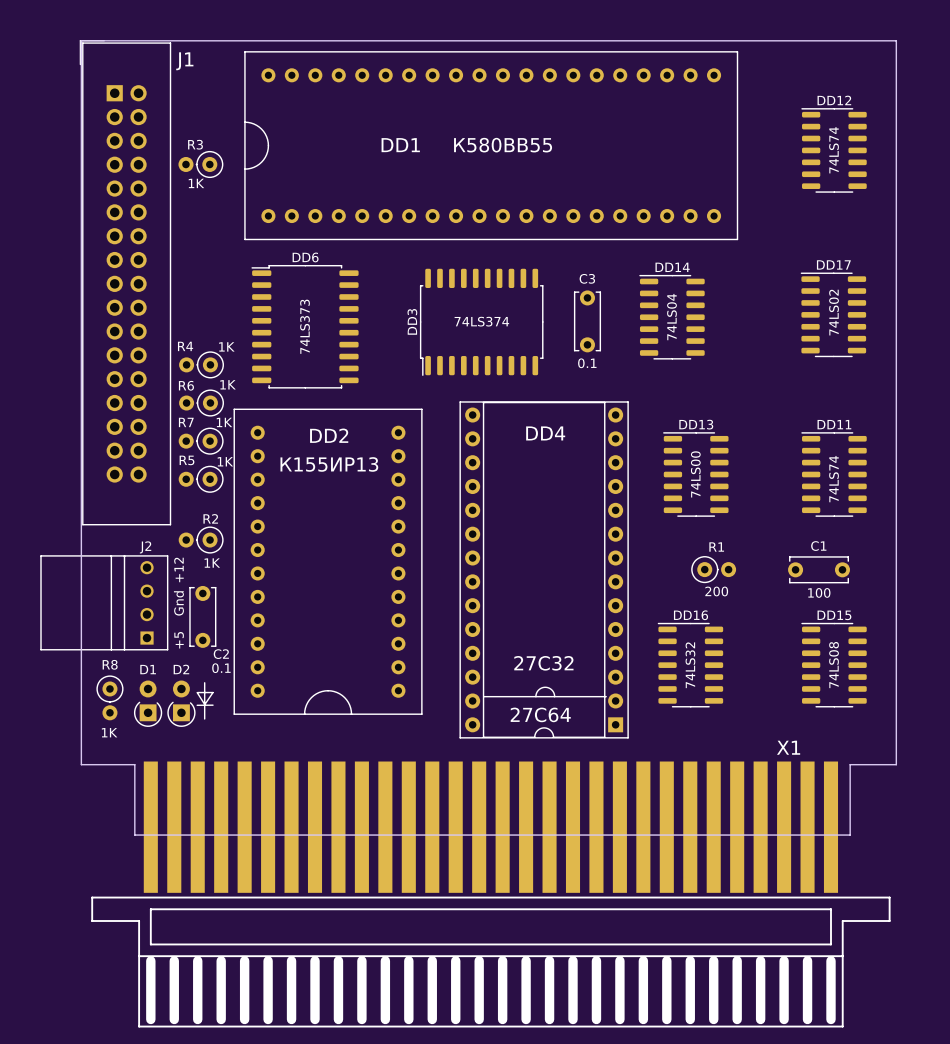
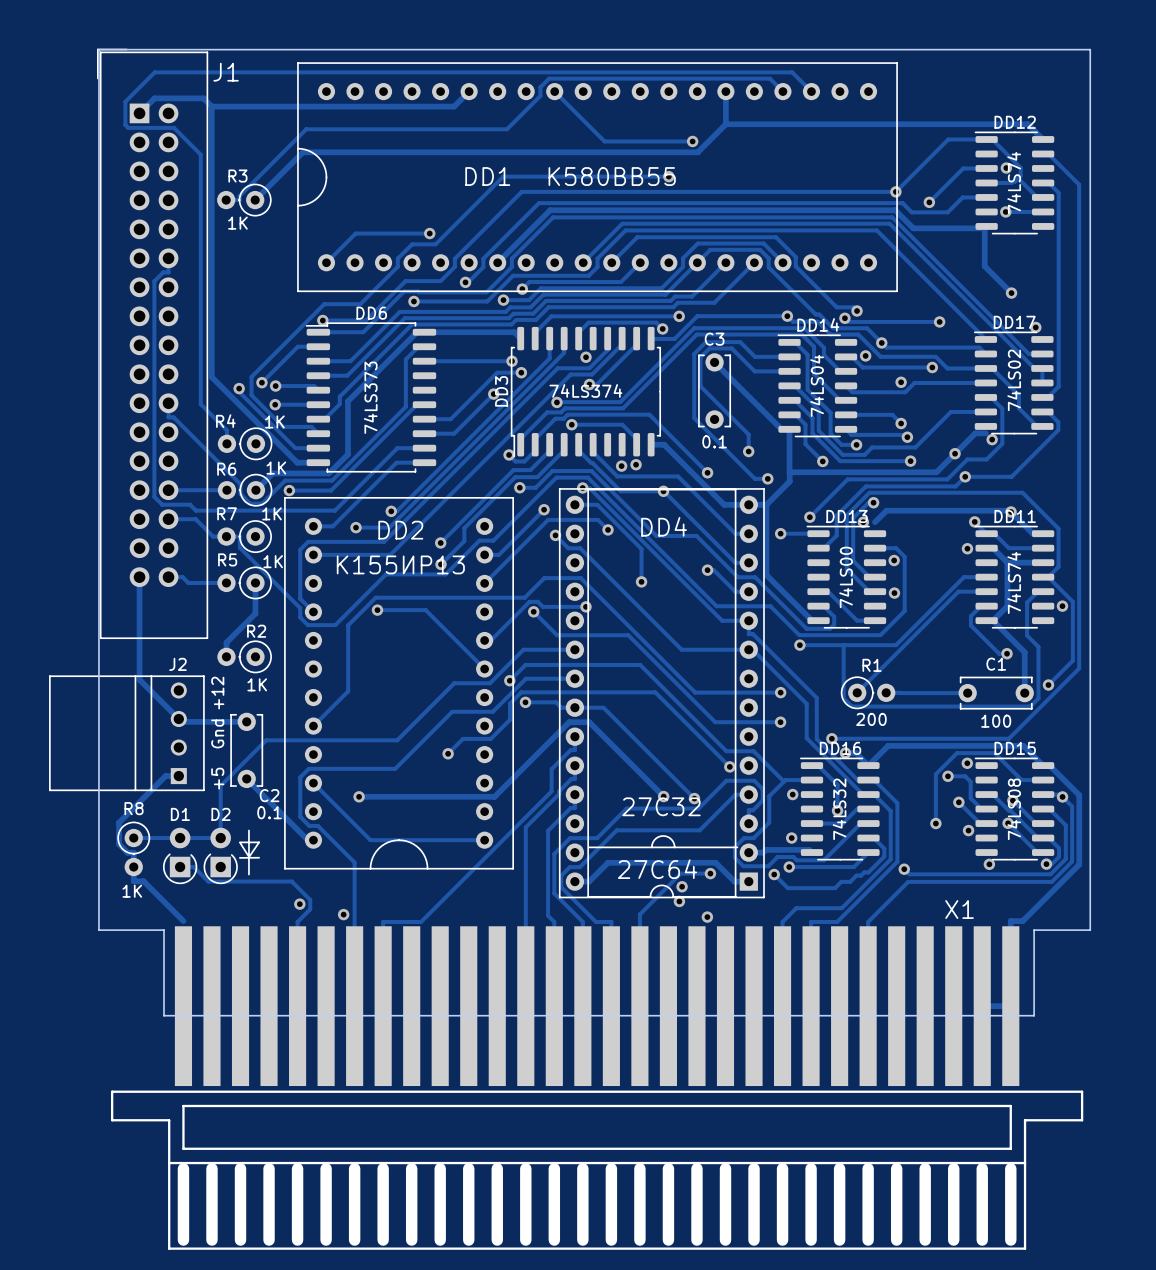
track: none -> (469, 91) (454, 106) (211, 106)
track: none -> (554, 91) (604, 141) (692, 141)
track: none -> (725, 91) (725, 124)
track: none -> (782, 91) (769, 78) (549, 78) (540, 87) (540, 95) (507, 129) (306, 129) (239, 195) (239, 200) (226, 200)
track: none -> (811, 91) (792, 72) (154, 72) (125, 101) (125, 125) (128, 127) (174, 127) (200, 154) (200, 404) (226, 430) (226, 443)
track: none -> (211, 106) (211, 377) (297, 462) (318, 462)
track: none -> (211, 106) (203, 98) (154, 98) (139, 113)
track: none -> (725, 124) (1027, 124) (1043, 139)
track: none -> (725, 124) (697, 152) (302, 152) (255, 200)
via: none -> (692, 141)
track: none -> (1043, 153) (1048, 153) (1079, 184) (1079, 668) (1008, 738) (831, 738)
track: none -> (986, 168) (963, 168) (929, 202)
via: none -> (1006, 168)
track: none -> (668, 176) (503, 176) (435, 244) (412, 244) (397, 258) (397, 266) (360, 304) (324, 304) (251, 376) (251, 395) (283, 426) (311, 426) (318, 433)
via: none -> (668, 176)
track: none -> (1018, 178) (1037, 197) (1043, 197)
track: none -> (986, 182) (1014, 181) (1020, 176) (1020, 167) (992, 139) (948, 139) (895, 191) (521, 191) (454, 258) (454, 266) (440, 281) (405, 281) (366, 320) (322, 320)
track: none -> (1043, 182) (1048, 182) (1058, 192) (1058, 386) (1047, 397) (1042, 397)
via: none -> (895, 191)
track: none -> (986, 197) (962, 197) (947, 212) (911, 212) (902, 203) (538, 203) (483, 258) (483, 267) (468, 282) (465, 282)
via: none -> (929, 202)
track: none -> (1005, 211) (1043, 211)
via: none -> (1005, 211)
track: none -> (984, 228) (913, 228) (895, 210) (550, 210) (497, 262)
track: none -> (984, 228) (984, 266) (1011, 293)
track: none -> (429, 233) (355, 233) (326, 262)
via: none -> (429, 233)
track: none -> (168, 258) (168, 272) (163, 272) (154, 281) (154, 496) (162, 504) (190, 504) (196, 510) (334, 510) (397, 448) (424, 448)
track: none -> (583, 262) (622, 223) (889, 223) (1034, 368) (1042, 368) (1042, 382)
track: none -> (611, 262) (637, 237) (775, 237) (795, 257) (795, 266) (836, 307) (853, 307) (857, 310)
track: none -> (640, 262) (621, 282) (529, 282) (522, 289)
track: none -> (725, 262) (692, 296) (675, 296) (670, 300) (546, 300) (533, 313) (513, 313) (509, 318) (404, 318) (347, 375) (318, 375)
track: none -> (754, 262) (714, 302) (677, 302) (673, 307) (548, 307) (535, 319) (516, 319) (511, 324) (412, 324) (339, 396) (339, 404) (324, 419) (318, 419)
track: none -> (782, 262) (763, 243) (697, 243) (683, 258) (683, 266) (661, 288) (540, 288) (529, 300) (503, 300)
via: none -> (465, 282)
via: none -> (522, 289)
via: none -> (1011, 293)
via: none -> (503, 300)
track: none -> (413, 301) (487, 301) (513, 275) (588, 275) (597, 267) (597, 258) (625, 230) (876, 230) (985, 339)
via: none -> (413, 301)
via: none -> (857, 310)
via: none -> (787, 316)
track: none -> (679, 316) (551, 316) (535, 332) (535, 338)
via: none -> (679, 316)
track: none -> (844, 318) (848, 321) (939, 321)
via: none -> (844, 318)
via: none -> (322, 320)
via: none -> (939, 321)
via: none -> (1035, 327)
track: none -> (662, 328) (656, 322) (588, 322) (578, 332) (578, 338)
via: none -> (662, 328)
track: none -> (318, 332) (363, 332) (404, 291) (486, 292) (511, 267) (511, 258) (553, 217) (892, 217) (1028, 353) (1042, 353)
track: none -> (520, 338) (514, 332) (417, 332) (347, 401) (347, 454) (329, 473) (272, 473) (255, 490)
track: none -> (549, 338) (549, 358) (396, 511) (391, 511)
track: none -> (564, 338) (564, 352) (389, 527) (356, 527)
track: none -> (607, 338) (607, 350) (589, 368) (557, 368) (384, 541) (308, 541) (300, 549) (300, 598) (313, 611)
track: none -> (622, 338) (622, 344) (592, 374) (570, 374) (390, 554) (313, 554)
track: none -> (636, 338) (636, 344) (596, 384) (589, 384)
track: none -> (651, 338) (674, 338) (697, 316) (787, 316) (792, 321) (817, 321) (830, 334) (858, 334) (880, 356) (935, 356) (947, 368) (992, 368) (1018, 395) (1018, 408) (1037, 426) (1042, 426)
track: none -> (789, 342) (795, 342) (807, 354) (807, 389) (830, 412) (830, 433) (841, 444) (856, 444)
via: none -> (881, 342)
track: none -> (318, 346) (297, 346) (261, 382)
track: none -> (424, 346) (418, 346) (405, 359) (405, 406) (332, 480) (285, 480) (262, 503) (250, 503) (240, 494) (240, 484) (173, 417) (168, 417) (168, 403)
track: none -> (985, 353) (979, 347) (886, 347) (867, 328) (833, 328) (819, 314) (815, 314) (768, 267) (768, 258) (760, 249) (710, 249) (665, 294) (543, 294) (530, 307) (510, 307) (505, 311) (399, 311) (350, 361) (318, 361)
via: none -> (865, 355)
via: none -> (586, 357)
track: none -> (789, 356) (755, 356) (740, 342) (705, 342) (694, 353) (694, 418) (754, 478) (767, 478)
track: none -> (846, 356) (852, 356) (862, 367) (932, 367)
track: none -> (424, 361) (512, 361)
via: none -> (512, 361)
track: none -> (714, 362) (781, 429) (789, 429) (789, 472)
via: none -> (932, 367)
track: none -> (789, 371) (754, 371) (731, 348) (709, 348) (700, 357) (700, 386) (748, 434) (748, 451)
track: none -> (846, 371) (840, 371) (823, 355) (823, 347) (804, 328) (694, 328) (620, 402) (556, 402)
track: none -> (521, 372) (497, 372) (450, 419) (424, 419)
via: none -> (521, 372)
via: none -> (261, 382)
via: none -> (901, 382)
track: none -> (985, 382) (914, 382) (905, 392) (852, 392) (846, 385)
via: none -> (589, 384)
track: none -> (275, 386) (314, 386) (318, 390)
via: none -> (275, 386)
track: none -> (789, 385) (794, 385) (818, 409) (818, 430) (842, 454) (864, 454) (872, 447) (915, 447) (950, 411) (985, 411)
track: none -> (239, 388) (239, 391) (295, 448) (318, 448)
via: none -> (239, 388)
track: none -> (493, 394) (454, 433) (424, 433)
via: none -> (493, 394)
track: none -> (985, 397) (991, 397) (1002, 408) (1002, 443) (986, 459) (967, 459) (947, 479) (847, 479) (809, 517)
track: none -> (789, 400) (794, 400) (812, 417) (812, 433) (840, 461) (910, 461)
track: none -> (846, 400) (840, 400) (813, 374) (813, 346) (801, 334) (696, 334) (622, 408) (565, 408) (561, 412) (547, 412) (520, 438) (520, 444)
via: none -> (556, 402)
track: none -> (275, 404) (318, 404)
via: none -> (275, 404)
track: none -> (424, 404) (416, 404) (331, 490) (289, 490)
track: none -> (1042, 411) (1048, 411) (1058, 422) (1058, 430) (1011, 476) (965, 476) (955, 486) (865, 486) (836, 515) (836, 535) (824, 548) (818, 548)
track: none -> (789, 414) (795, 414) (805, 424) (805, 444) (822, 461)
track: none -> (846, 414) (892, 414) (901, 423)
via: none -> (901, 423)
track: none -> (571, 424) (622, 424) (636, 439) (636, 444)
via: none -> (571, 424)
track: none -> (846, 429) (851, 434) (905, 434) (907, 437)
track: none -> (985, 433) (975, 433) (936, 472) (789, 472)
via: none -> (907, 437)
via: none -> (992, 439)
track: none -> (549, 444) (549, 450) (530, 470) (513, 470) (440, 542)
track: none -> (564, 444) (564, 450) (537, 477) (515, 477) (464, 528) (464, 541) (441, 564)
track: none -> (578, 444) (578, 450) (620, 491) (663, 491) (735, 562) (748, 562)
track: none -> (593, 444) (593, 452) (617, 476) (678, 476) (735, 533) (748, 533)
track: none -> (651, 444) (664, 444) (724, 504) (766, 504)
via: none -> (856, 444)
via: none -> (748, 451)
via: none -> (955, 453)
track: none -> (509, 454) (515, 461) (524, 461) (535, 450) (535, 439) (555, 418) (563, 418) (567, 414) (649, 414) (707, 472)
via: none -> (509, 454)
via: none -> (822, 461)
via: none -> (910, 461)
track: none -> (424, 462) (396, 462) (332, 526) (313, 526)
via: none -> (636, 464)
via: none -> (621, 466)
via: none -> (707, 472)
track: none -> (789, 472) (789, 481) (766, 504)
via: none -> (965, 476)
via: none -> (767, 478)
track: none -> (519, 487) (535, 487) (552, 471) (591, 471) (656, 535) (696, 535) (737, 577) (755, 577) (806, 628) (830, 628) (834, 624) (834, 616) (823, 606) (818, 606)
via: none -> (519, 487)
track: none -> (582, 487) (589, 487) (722, 620) (748, 620) (748, 634) (753, 634) (816, 697) (816, 739) (857, 780) (874, 780) (897, 803) (897, 861) (837, 921) (811, 921) (811, 1006)
via: none -> (582, 487)
track: none -> (168, 490) (226, 490)
via: none -> (289, 490)
via: none -> (663, 491)
track: none -> (873, 502) (868, 502) (853, 518) (853, 560) (869, 577) (875, 577)
via: none -> (873, 502)
track: none -> (574, 504) (597, 504) (641, 548) (641, 581)
track: none -> (766, 504) (766, 575) (812, 620) (818, 620)
track: none -> (544, 509) (498, 554) (484, 554)
via: none -> (544, 509)
via: none -> (391, 511)
via: none -> (1011, 511)
via: none -> (809, 517)
track: none -> (168, 519) (195, 519) (213, 536) (239, 536) (239, 547) (300, 608) (300, 617) (307, 625) (335, 625) (386, 574) (445, 574) (479, 540) (493, 540) (556, 477) (587, 477) (716, 606) (770, 606) (799, 635) (880, 635) (904, 611) (904, 556) (896, 548) (875, 548)
via: none -> (863, 522)
track: none -> (875, 522) (886, 510) (1009, 510) (1032, 533) (1043, 533)
track: none -> (974, 521) (986, 533) (994, 533) (1008, 548) (1043, 548)
via: none -> (974, 521)
via: none -> (356, 527)
track: none -> (608, 529) (598, 519) (548, 519) (484, 583)
via: none -> (608, 529)
track: none -> (780, 533) (818, 533)
via: none -> (780, 533)
track: none -> (555, 535) (568, 548) (580, 548) (681, 649) (752, 649) (806, 703) (806, 738) (863, 794) (874, 794) (890, 811) (890, 859) (841, 908) (796, 908) (782, 921) (782, 1006)
via: none -> (555, 535)
via: none -> (440, 542)
track: none -> (986, 548) (992, 548) (1007, 562)
via: none -> (967, 548)
via: none -> (894, 560)
track: none -> (1007, 562) (1043, 562)
track: none -> (1007, 562) (1007, 606) (993, 620)
via: none -> (441, 564)
track: none -> (707, 570) (713, 570) (735, 591) (748, 591)
via: none -> (707, 570)
track: none -> (139, 577) (139, 679) (181, 721) (246, 721)
track: none -> (168, 577) (182, 577) (188, 582) (226, 582)
track: none -> (986, 577) (964, 577) (896, 645) (799, 645)
track: none -> (1048, 577) (1072, 601) (1072, 660) (1048, 685)
track: none -> (1048, 577) (1058, 566) (1058, 528) (1022, 492) (869, 492) (846, 515) (846, 568) (869, 591) (875, 591)
via: none -> (641, 581)
track: none -> (255, 582) (255, 613) (226, 642) (226, 656)
track: none -> (818, 591) (828, 591) (857, 620) (875, 620)
track: none -> (986, 591) (958, 591) (857, 692)
track: none -> (1043, 591) (1038, 591) (1027, 602) (1027, 635) (1038, 646) (1038, 698) (1030, 706) (851, 706) (843, 698) (843, 645)
via: none -> (894, 593)
track: none -> (585, 606) (542, 606) (537, 601) (529, 601) (490, 640) (484, 640)
via: none -> (585, 606)
track: none -> (986, 606) (980, 606) (970, 616) (970, 625) (999, 653) (1007, 653)
via: none -> (1062, 606)
track: none -> (377, 610) (425, 610) (484, 669)
via: none -> (377, 610)
track: none -> (533, 611) (557, 635) (628, 635) (715, 722) (780, 722)
via: none -> (533, 611)
track: none -> (993, 620) (1024, 652) (1024, 693)
via: none -> (799, 645)
track: none -> (574, 649) (523, 649) (489, 683) (454, 683) (397, 740) (266, 740) (220, 785) (220, 838) (133, 838)
via: none -> (1007, 653)
track: none -> (574, 678) (525, 678) (492, 711) (452, 711) (395, 768) (308, 768) (300, 777) (300, 816) (309, 825) (317, 825) (354, 862) (354, 1006)
track: none -> (509, 680) (525, 664) (640, 664) (726, 751) (753, 751) (783, 781)
via: none -> (509, 680)
via: none -> (1048, 685)
track: none -> (780, 692) (695, 692) (580, 578) (544, 578) (524, 597) (375, 597) (348, 625) (348, 691) (313, 726)
via: none -> (780, 692)
track: none -> (886, 692) (967, 693)
track: none -> (525, 702) (556, 702) (561, 707) (603, 707) (694, 798)
via: none -> (525, 702)
via: none -> (780, 722)
track: none -> (574, 736) (574, 750) (570, 750) (551, 769) (551, 791) (421, 921) (383, 921) (383, 1006)
via: none -> (831, 738)
track: none -> (448, 753) (463, 738) (490, 738) (509, 719) (509, 703) (521, 692) (655, 692) (729, 766)
via: none -> (448, 753)
track: none -> (845, 753) (855, 753) (868, 765) (888, 745) (1023, 745) (1043, 765) (1049, 765) (1079, 795) (1079, 864) (1022, 921) (1010, 921) (1010, 1006) (982, 1006)
via: none -> (845, 753)
via: none -> (967, 763)
track: none -> (574, 765) (574, 779) (571, 779) (525, 827) (525, 1006)
track: none -> (811, 765) (818, 765) (837, 784) (837, 810)
via: none -> (729, 766)
track: none -> (178, 776) (165, 776) (119, 822) (119, 844) (127, 852) (133, 852) (133, 881) (143, 881) (183, 921)
track: none -> (947, 776) (965, 776) (970, 781) (970, 798) (981, 809) (986, 809)
via: none -> (947, 776)
track: none -> (246, 778) (307, 840) (313, 840)
track: none -> (811, 780) (785, 780) (769, 796) (769, 822) (753, 838) (744, 838) (734, 847) (734, 857) (743, 866) (768, 866) (777, 857) (793, 857) (796, 860) (823, 860) (860, 823) (868, 823)
track: none -> (1043, 780) (1021, 780) (994, 753) (956, 753) (935, 774) (935, 823)
track: none -> (313, 783) (370, 840) (484, 840)
track: none -> (574, 794) (574, 808) (570, 808) (548, 830) (548, 915) (554, 921) (554, 1006)
track: none -> (748, 794) (735, 794) (699, 830) (616, 830) (579, 867) (569, 867) (561, 875) (561, 887) (596, 921) (611, 921) (611, 1006)
via: none -> (792, 794)
track: none -> (986, 794) (992, 794) (1037, 838) (1048, 838) (1059, 848) (1059, 856) (1051, 864) (1046, 864)
track: none -> (1043, 794) (1060, 794) (1072, 806) (1072, 861) (1051, 881) (908, 881) (868, 921) (868, 1006)
track: none -> (663, 796) (589, 722) (569, 722) (494, 796) (359, 796)
via: none -> (663, 796)
via: none -> (359, 796)
via: none -> (1062, 796)
via: none -> (694, 798)
track: none -> (1012, 800) (1035, 823) (1043, 823)
via: none -> (1012, 800)
track: none -> (958, 802) (980, 823) (986, 823)
via: none -> (958, 802)
track: none -> (868, 809) (857, 809) (842, 823) (811, 823)
track: none -> (1043, 809) (1049, 809) (1065, 825) (1065, 859) (1050, 874) (909, 874) (904, 869)
via: none -> (837, 810)
track: none -> (1008, 823) (1037, 852) (1043, 852)
via: none -> (1008, 823)
track: none -> (748, 823) (748, 810) (753, 810) (762, 800) (762, 789) (754, 780) (726, 780) (698, 808) (626, 808) (597, 838) (570, 838) (554, 853) (554, 893) (582, 921) (582, 1006)
via: none -> (935, 823)
via: none -> (968, 830)
via: none -> (791, 838)
track: none -> (868, 838) (873, 838) (884, 848) (884, 856) (868, 872) (856, 875) (850, 881) (841, 881) (835, 888) (787, 888) (774, 874)
track: none -> (811, 852) (809, 849) (765, 849) (763, 852) (748, 852)
track: none -> (868, 852) (853, 867) (789, 867)
via: none -> (989, 864)
via: none -> (1046, 864)
track: none -> (180, 867) (194, 867) (208, 881) (291, 881) (310, 899) (310, 909) (297, 921) (297, 1006)
via: none -> (789, 867)
via: none -> (904, 869)
track: none -> (710, 873) (680, 873) (639, 914) (639, 1006)
via: none -> (710, 873)
via: none -> (774, 874)
track: none -> (574, 881) (589, 881) (608, 862) (715, 862) (734, 881) (748, 881)
via: none -> (682, 886)
via: none -> (679, 901)
via: none -> (299, 904)
via: none -> (343, 914)
via: none -> (707, 917)

